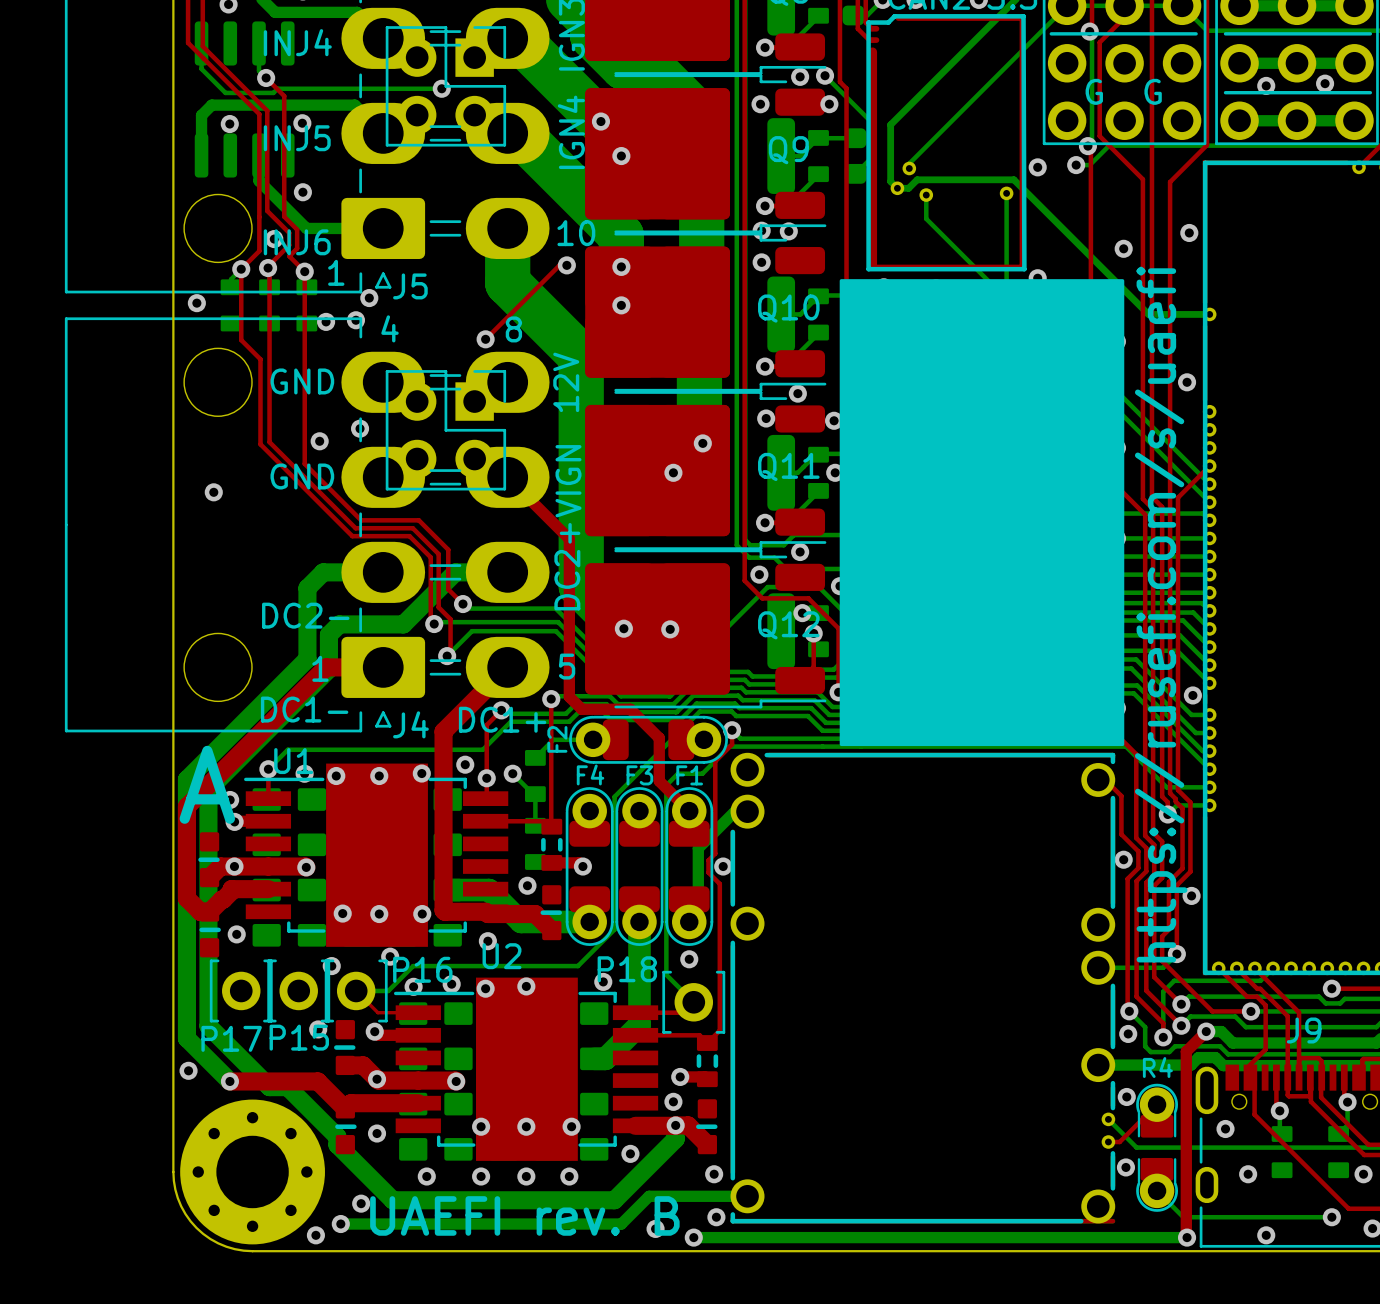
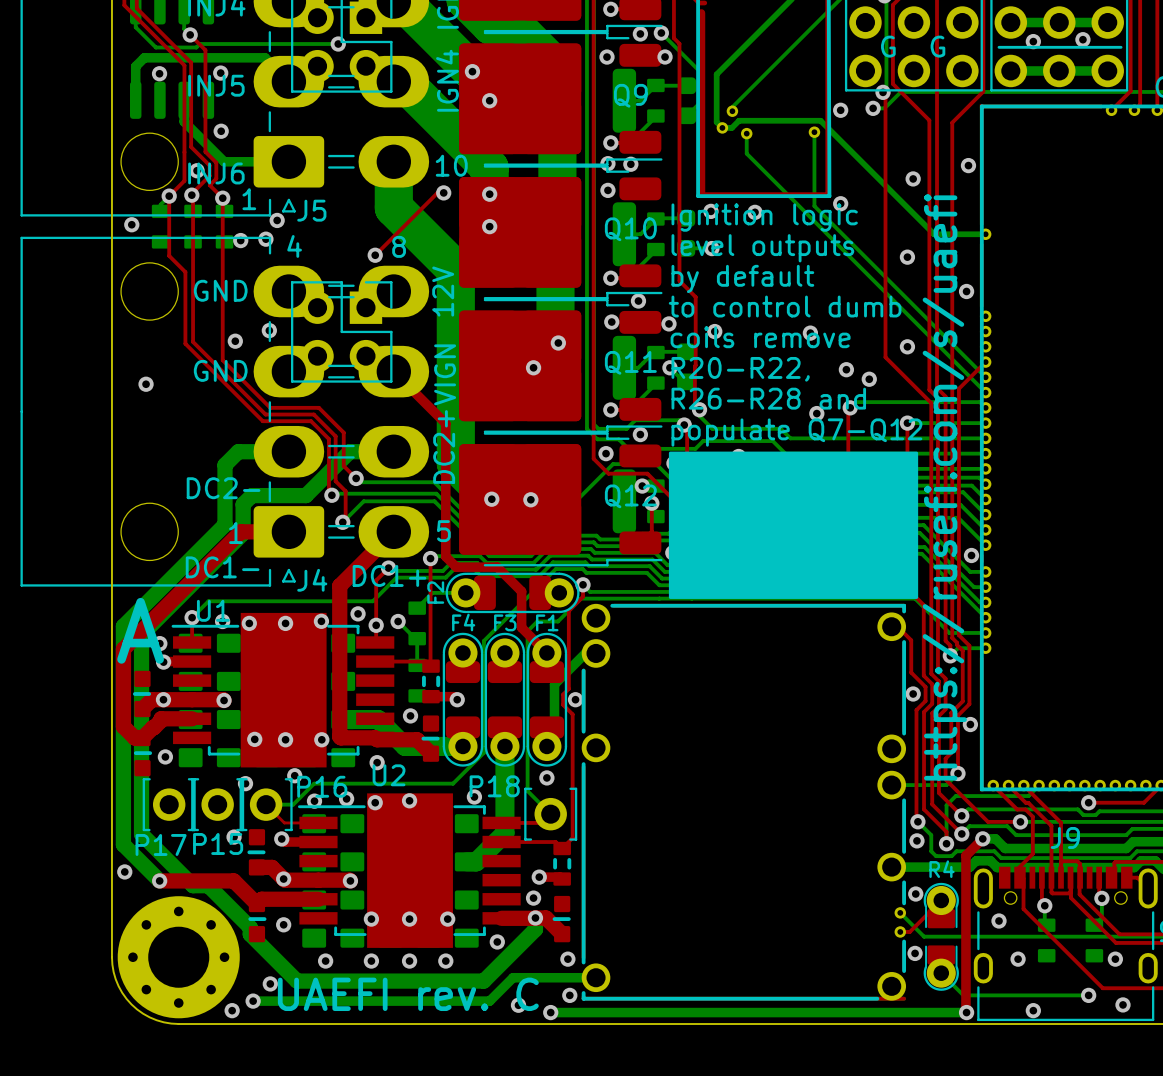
drawing: [839, 279, 1125, 747] -> none
text: none -> Ignition logic (764, 217)
text: none -> level outputs (762, 248)
text: none -> by default (742, 278)
text: none -> to control dumb (785, 306)
text: none -> coils remove (760, 337)
text: none -> R20-R22, (740, 369)
text: none -> R26-R28 and (768, 398)
text: none -> populate Q7-Q12 (796, 432)
drawing: none -> [668, 451, 919, 599]
text: UAEFI rev. B (524, 1215) -> UAEFI rev. C (408, 994)

